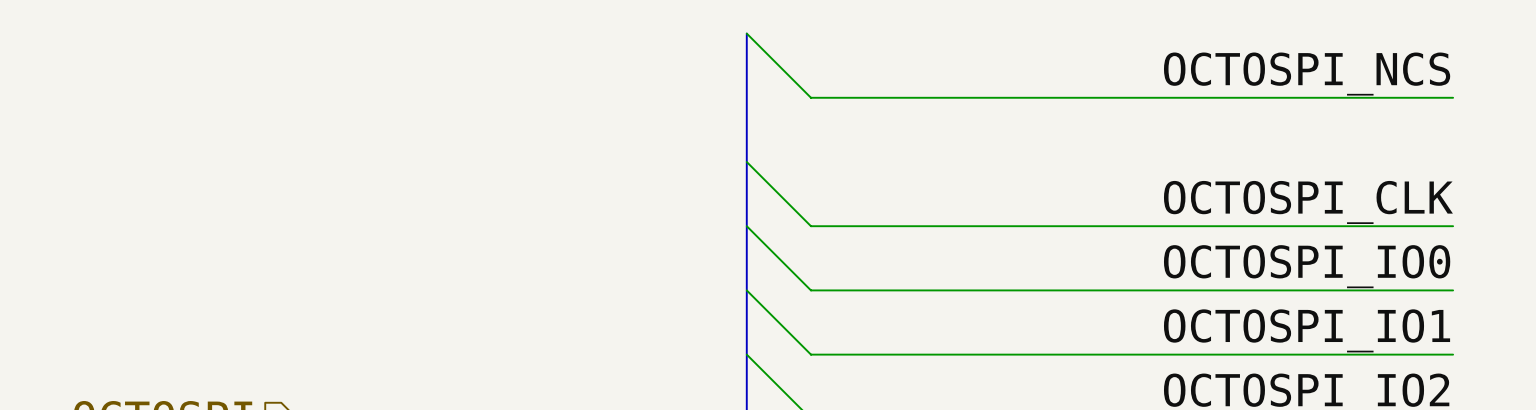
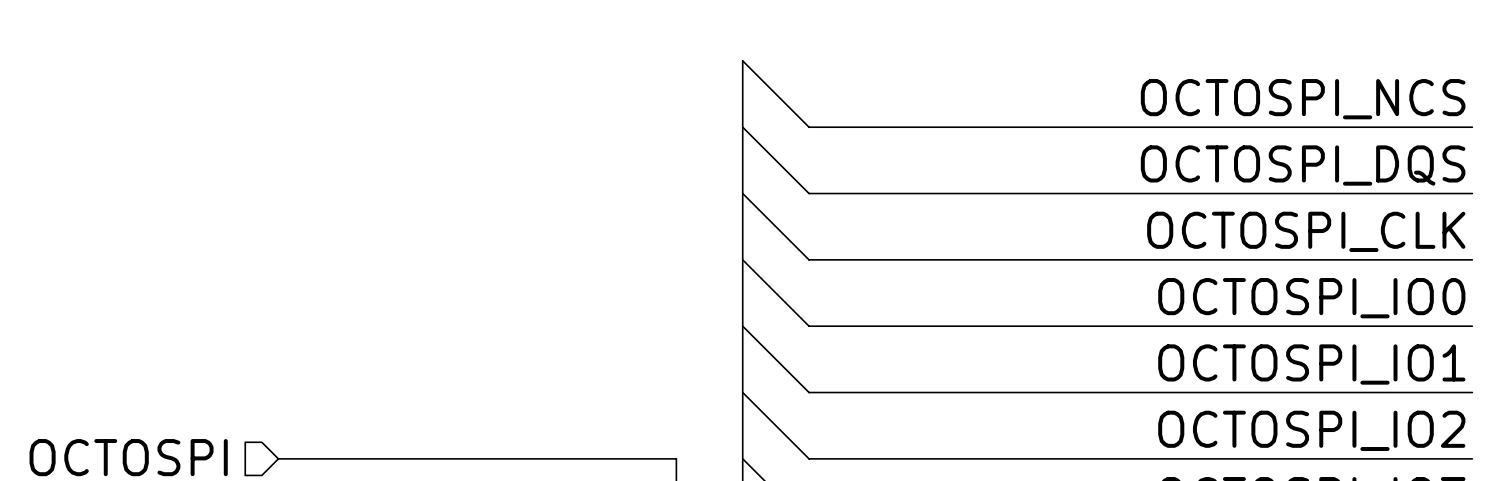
wire: none -> (742, 127) (809, 193) (1472, 193)
label: none -> OCTOSPI_DQS (1303, 165)

